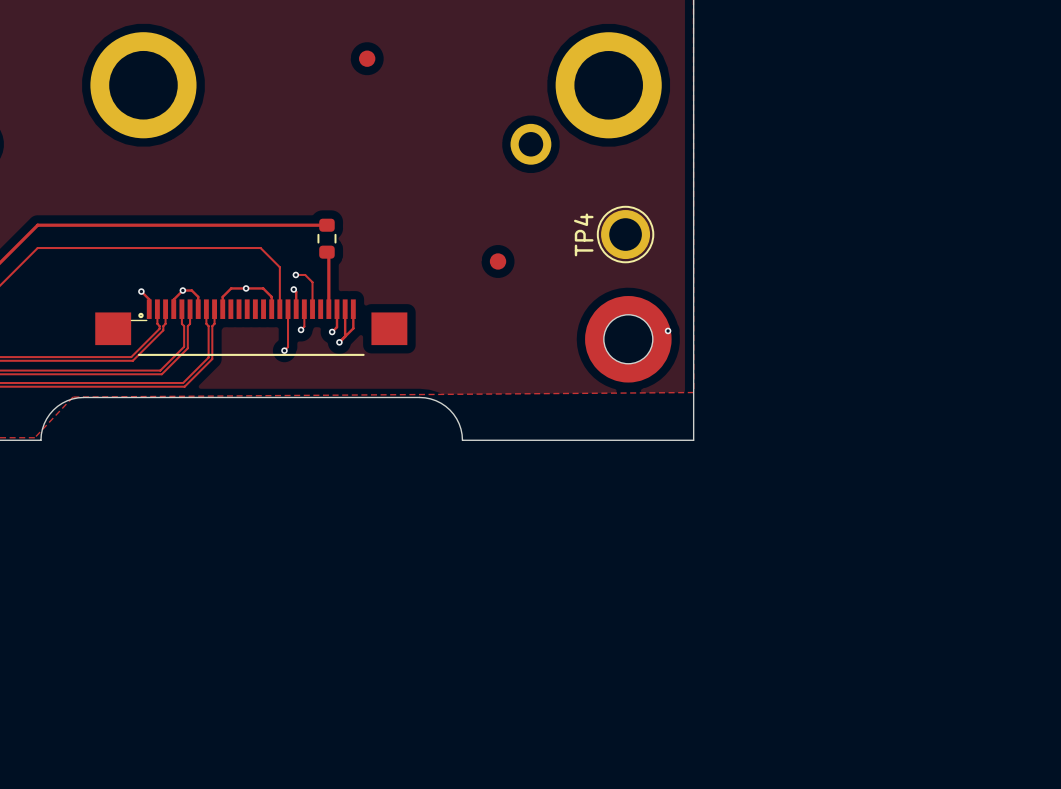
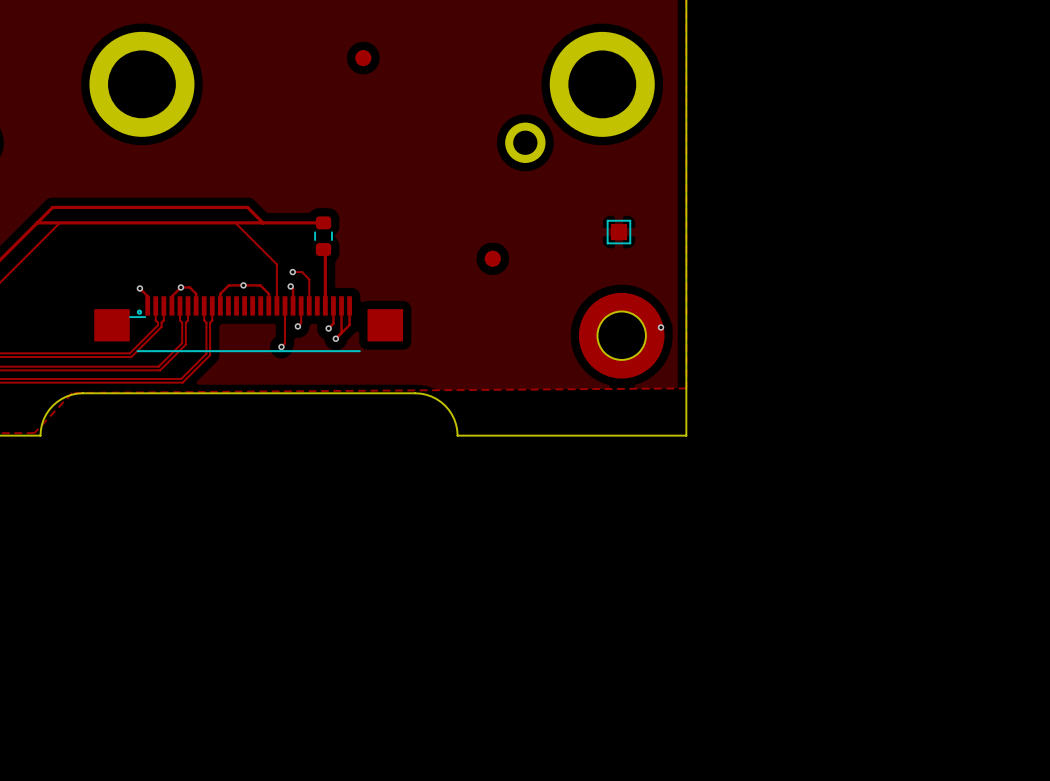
track: none -> (37, 222) (52, 207) (247, 207) (263, 222)
track: none -> (235, 222) (257, 245)
TP4: (625, 234) -> none
part: none -> (618, 232)
track: (37, 248) (260, 248) -> (37, 245) (59, 222)

